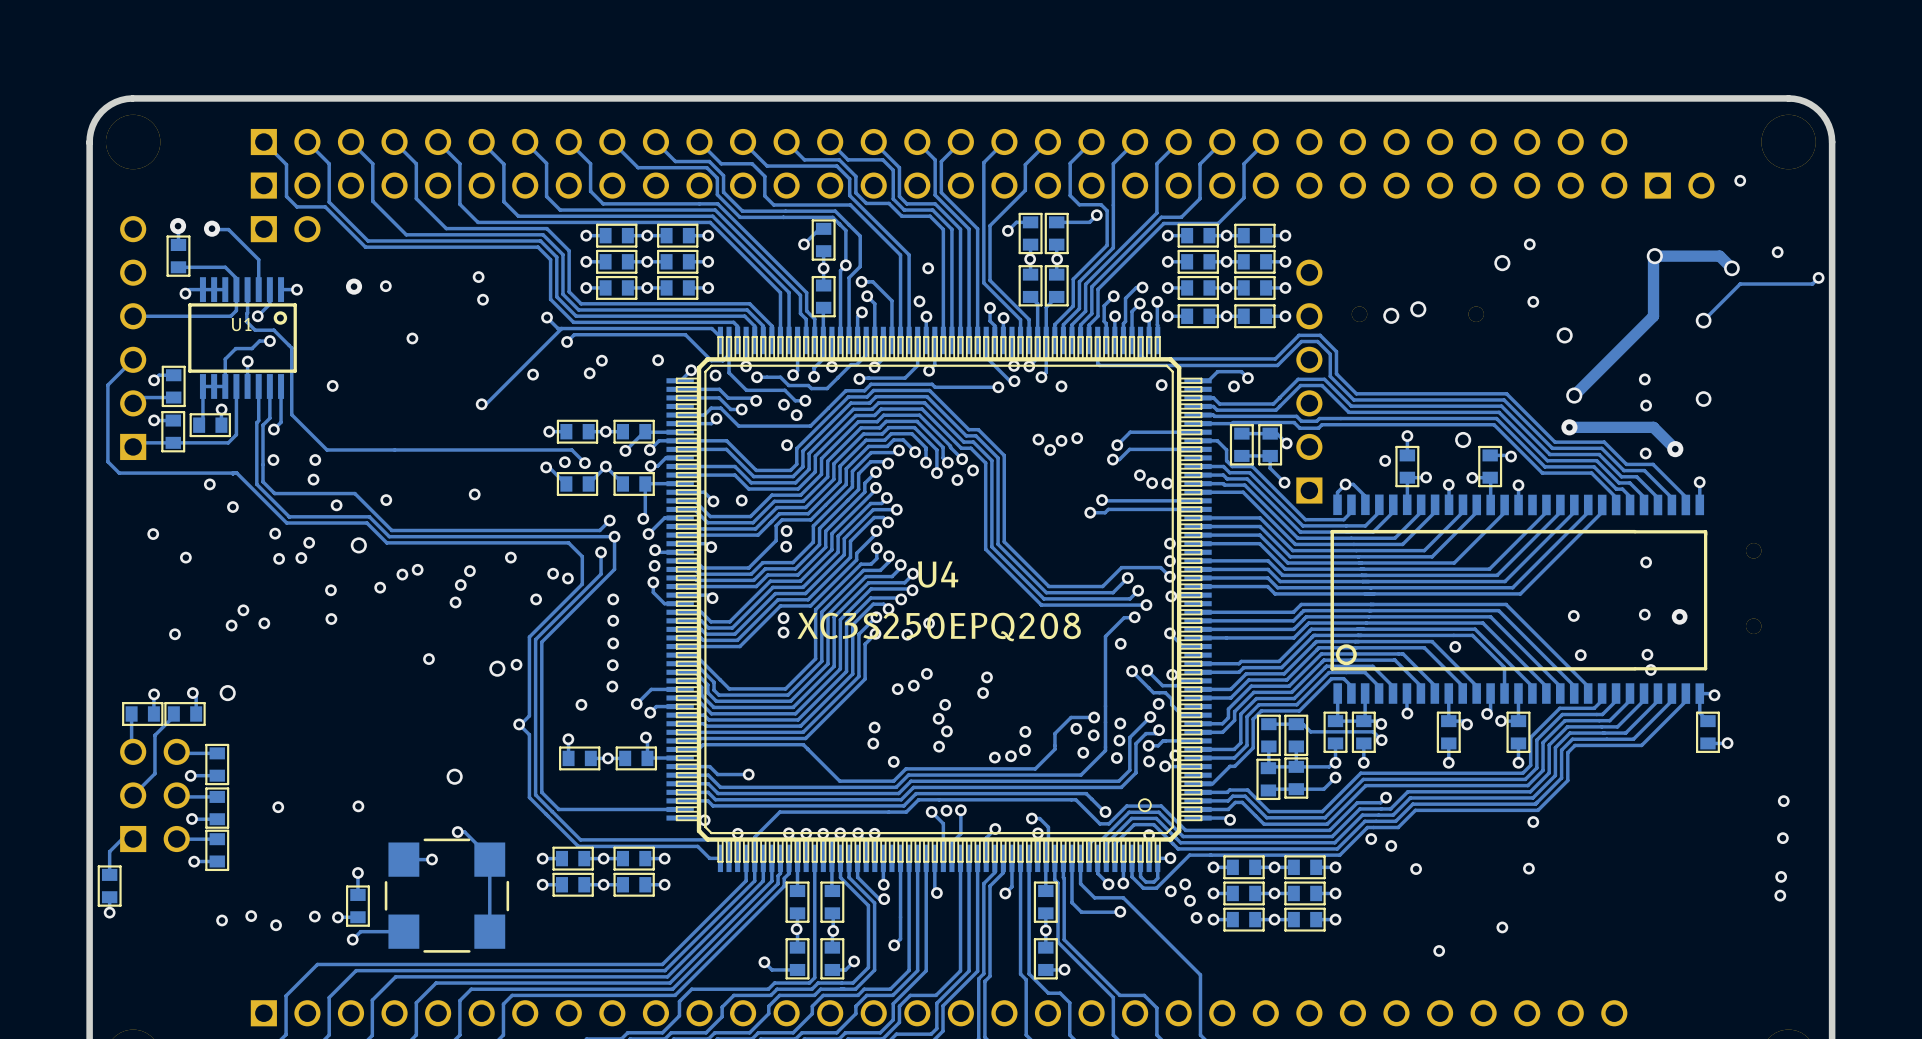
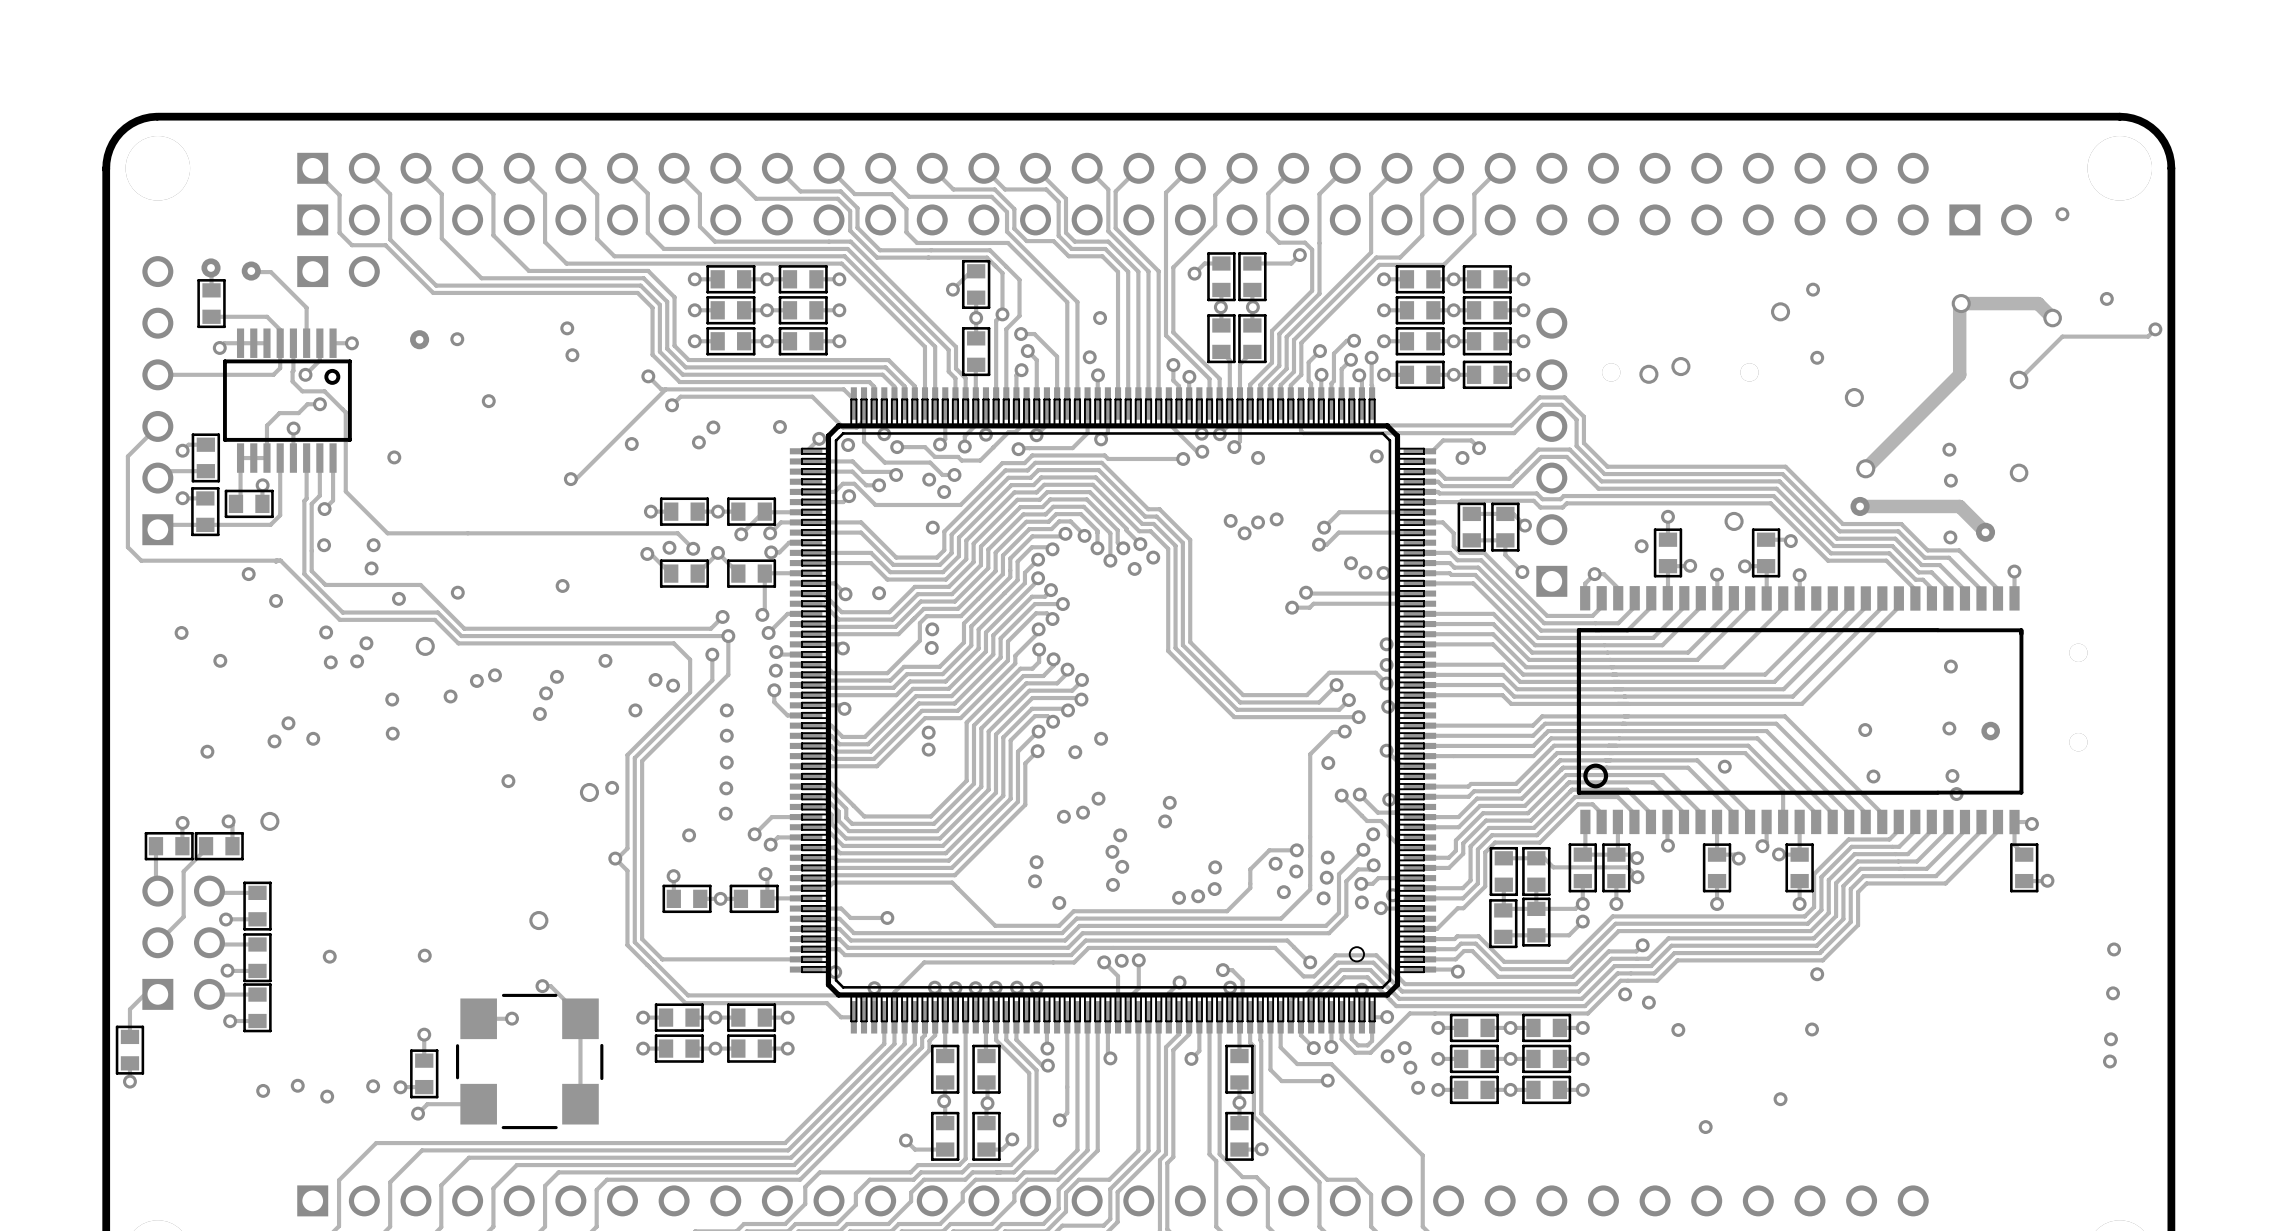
U1 name: U1 (241, 324) -> none
U4 name: U4 (938, 574) -> none
U4 value: XC3S250EPQ208 (939, 627) -> none

